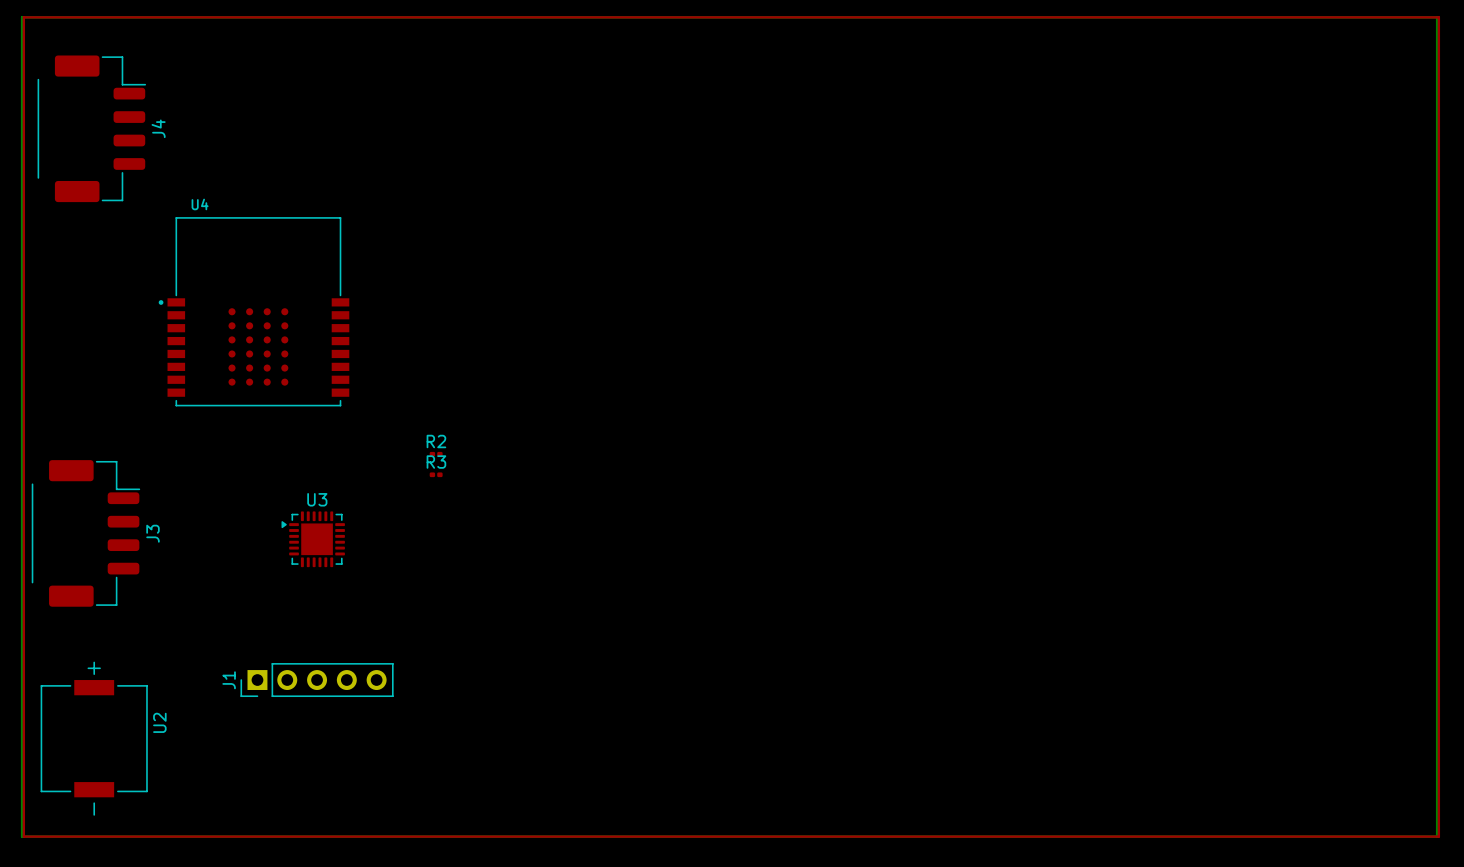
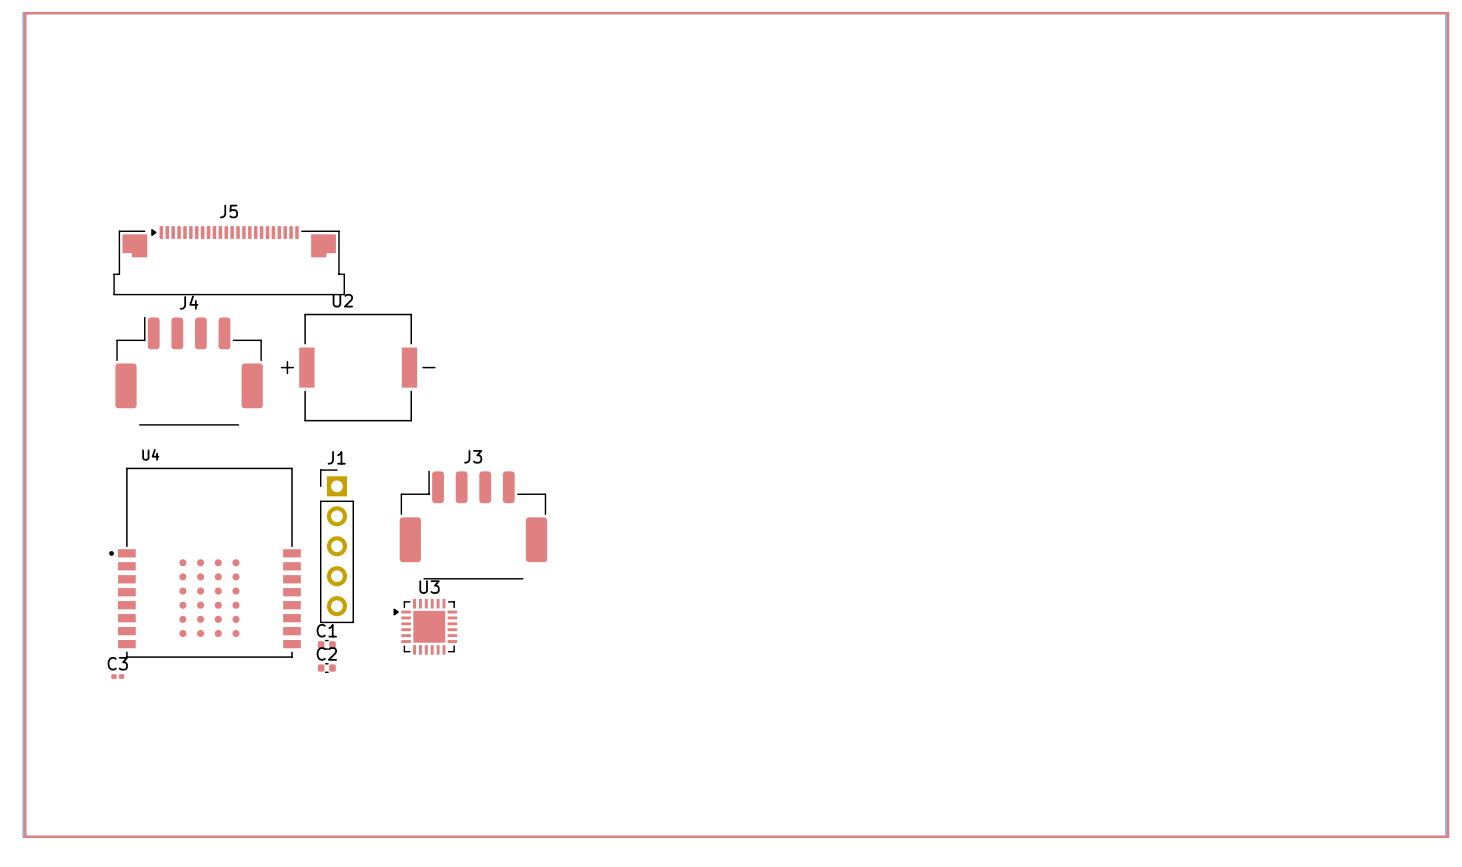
J4 rotation: 0° (91, 128) -> 90° counterclockwise (189, 371)
J4 position: (91, 128) -> (189, 371)
J5: none -> (229, 260)
U4 position: (254, 311) -> (205, 562)
R2: (436, 454) -> none
R3: (436, 474) -> none
J3 rotation: 0° (85, 533) -> 90° counterclockwise (473, 525)
J3 position: (85, 533) -> (473, 525)
U3 position: (313, 539) -> (425, 626)
C1: none -> (326, 644)
C2: none -> (326, 668)
C3: none -> (117, 676)
J1 rotation: 0° (317, 680) -> 90° clockwise (336, 546)
J1 position: (317, 680) -> (336, 546)
U2 rotation: 0° (94, 738) -> 90° counterclockwise (358, 367)
U2 position: (94, 738) -> (358, 367)

